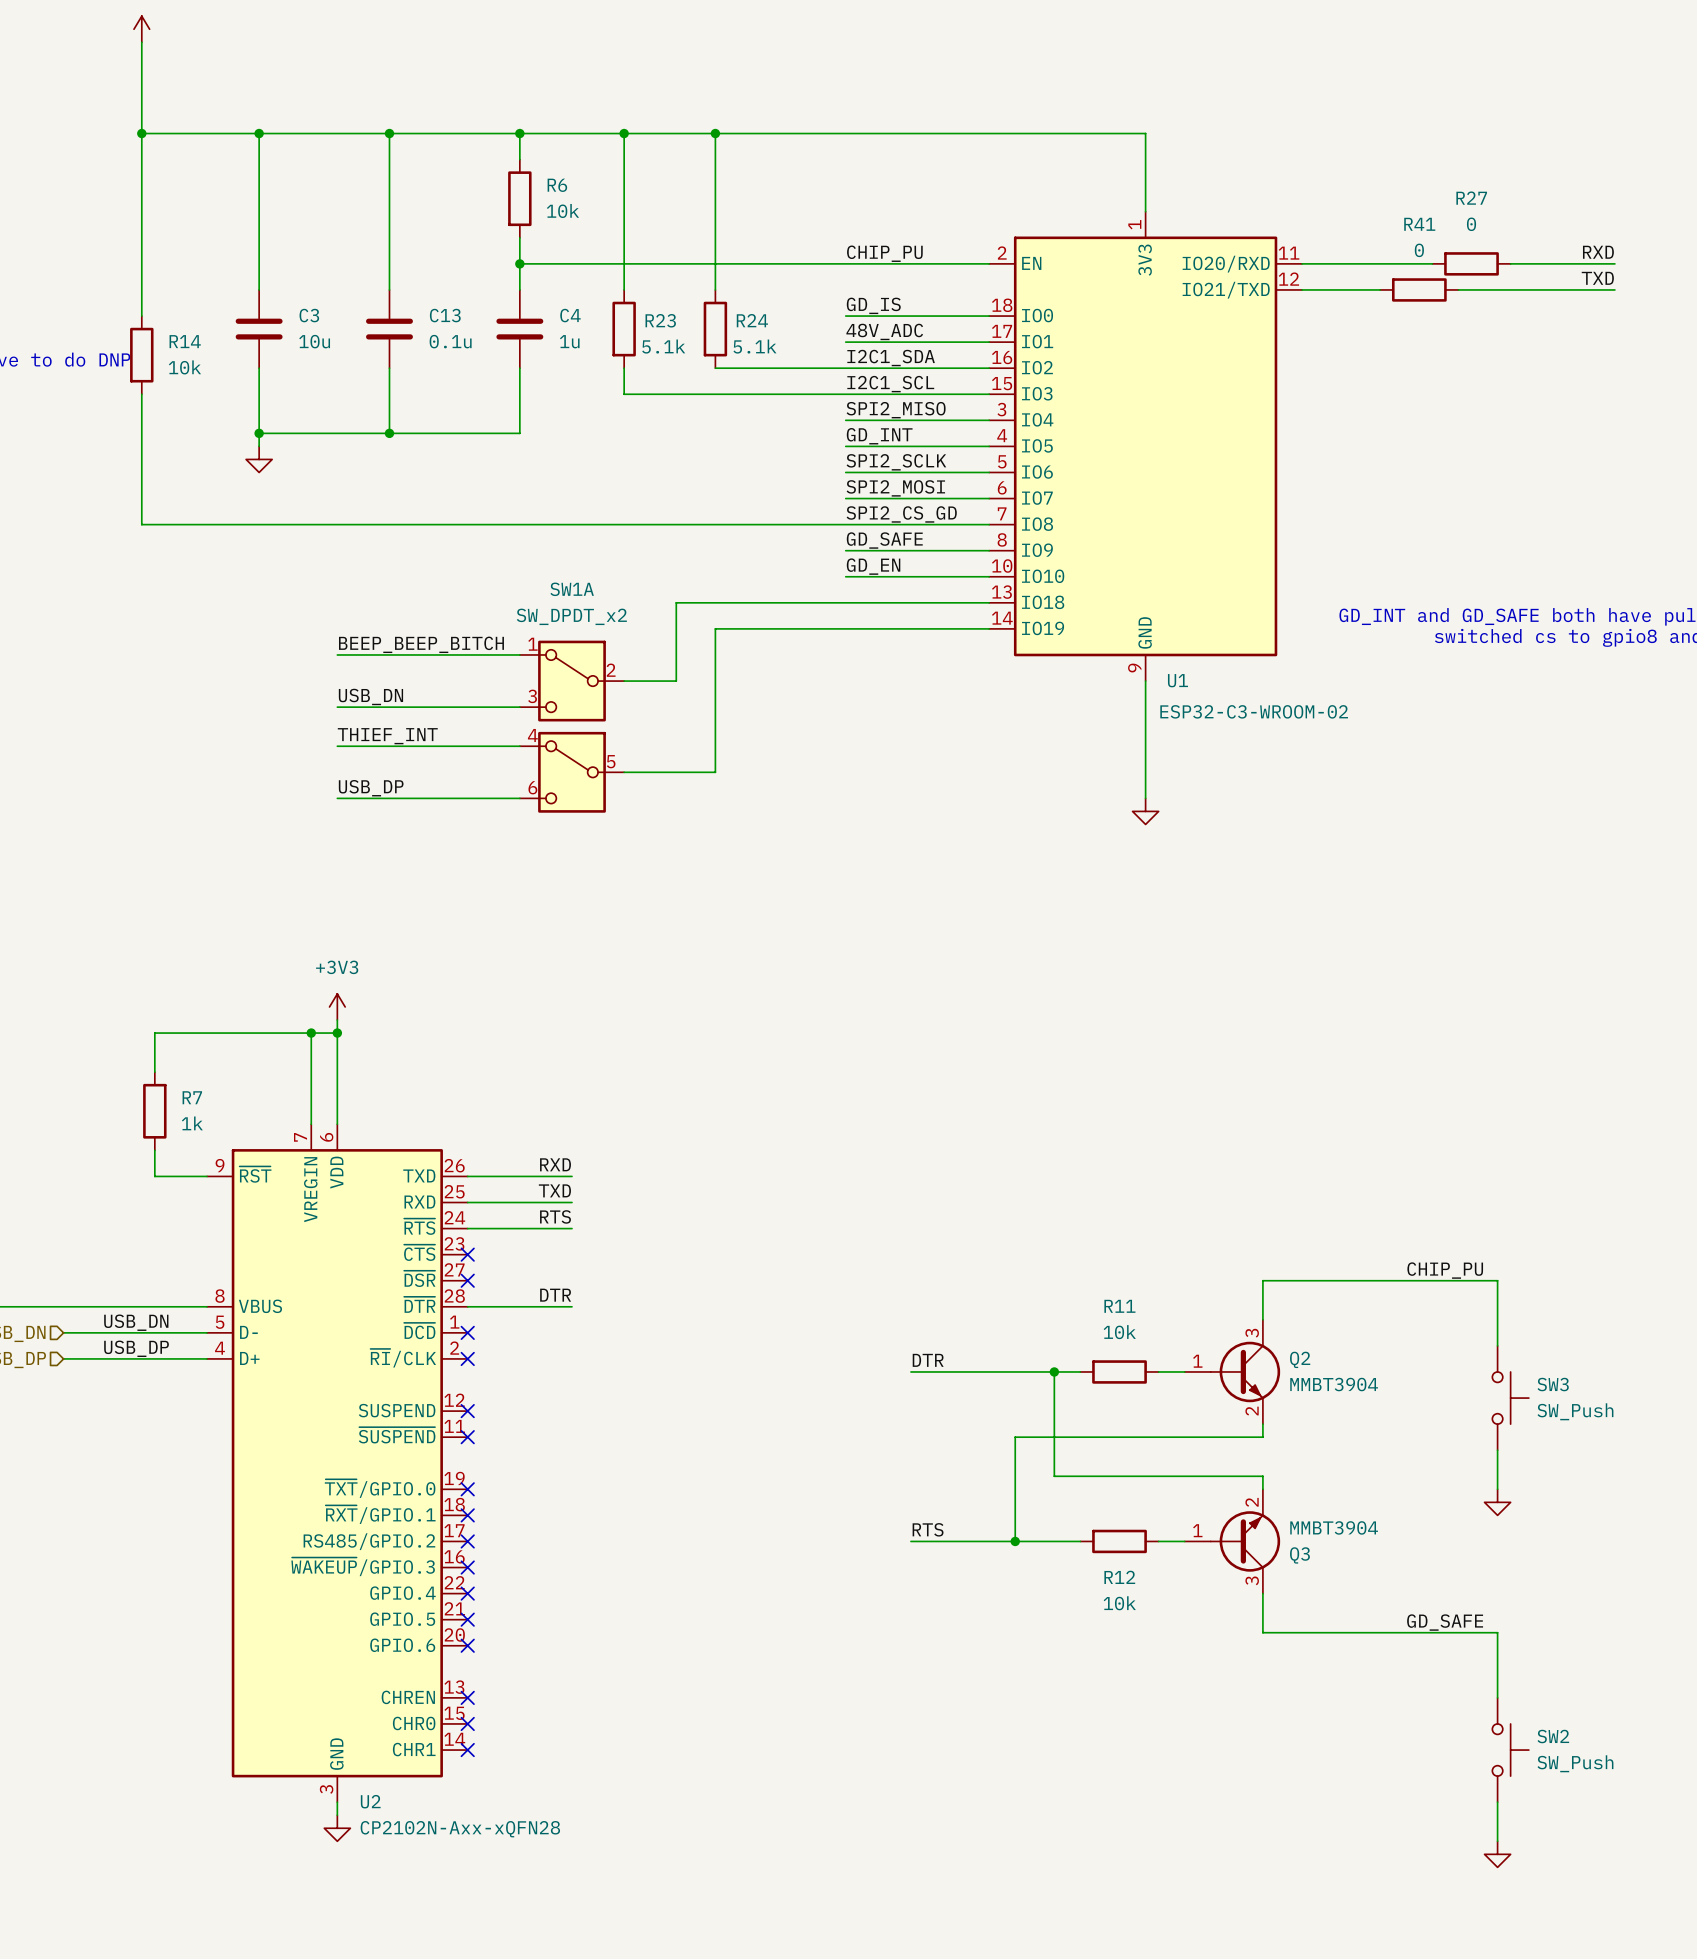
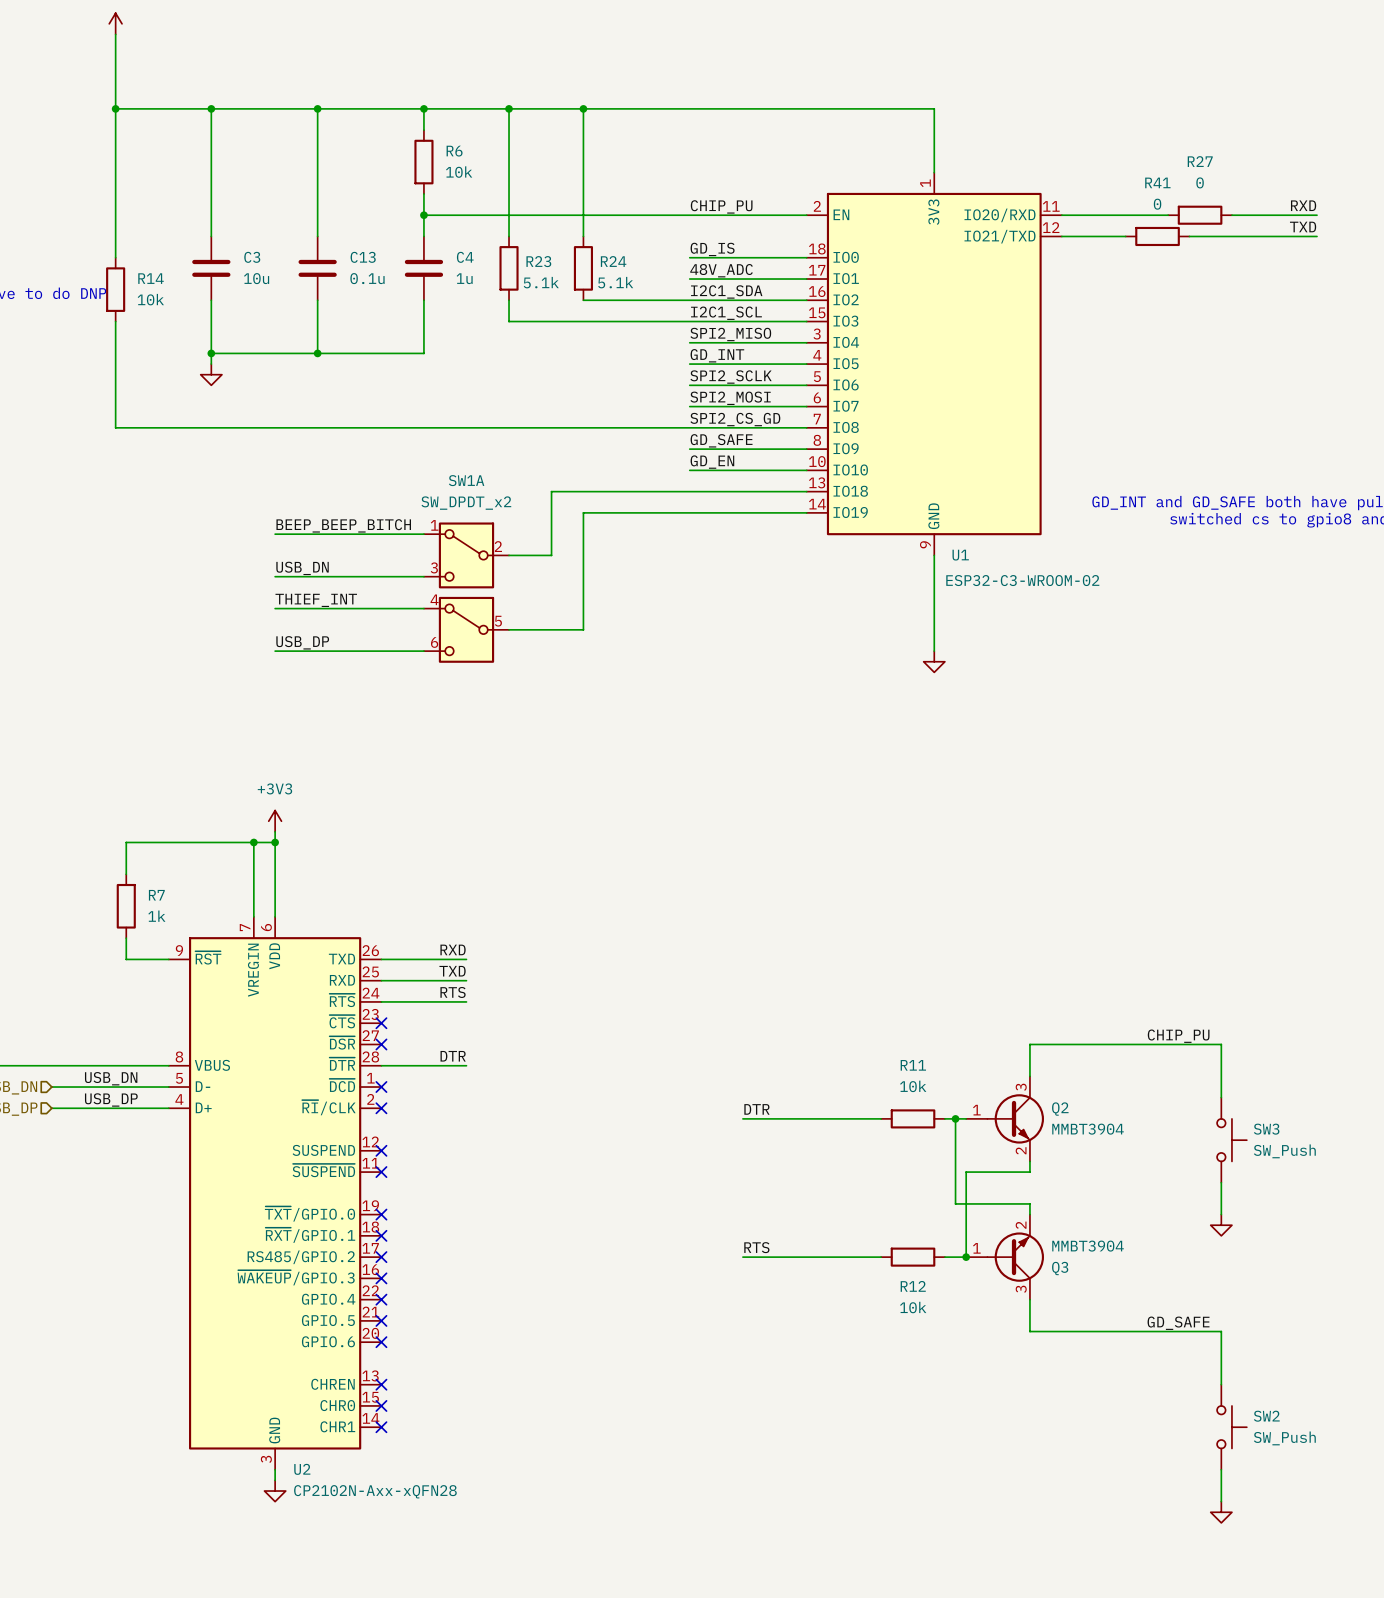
wire: (1054, 1371) (1054, 1476) (1171, 1476) -> (955, 1118) (955, 1203)
junction: (1054, 1371) -> none
junction: none -> (955, 1118)
wire: (1184, 1437) (1015, 1437) (1015, 1541) -> (966, 1172) (966, 1257)
junction: (1015, 1541) -> none
junction: none -> (966, 1257)

